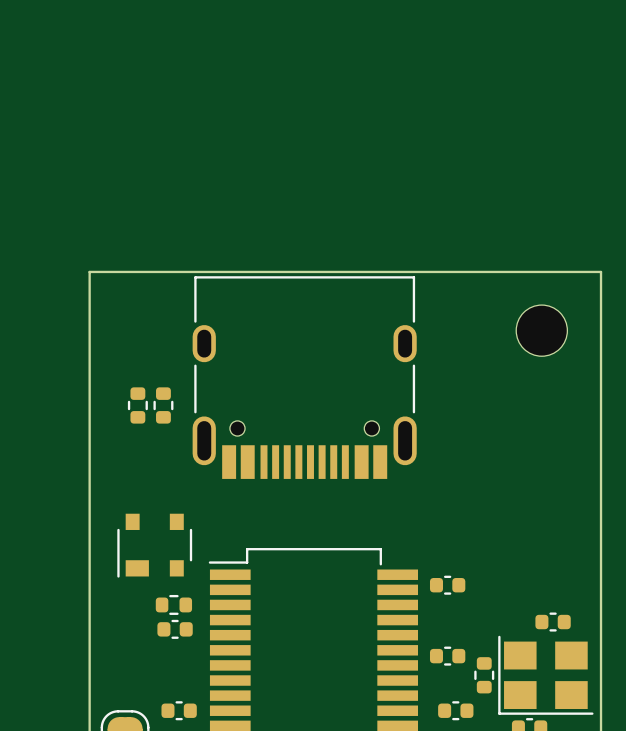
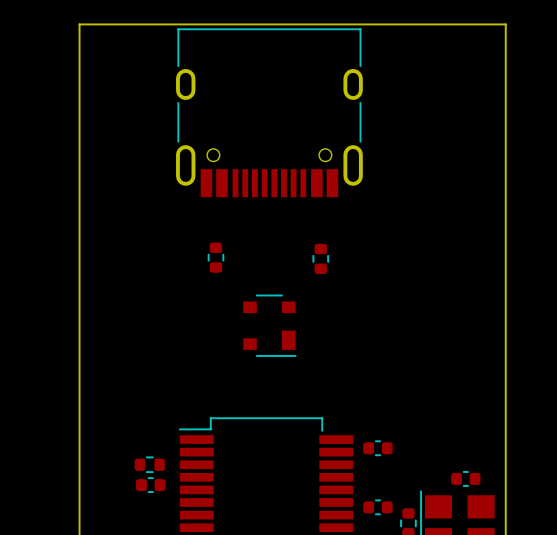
board edge: (89, 271) (601, 271) -> (79, 187) (79, 24) (505, 24) (505, 187)
part: (541, 330) -> none
part: none -> (215, 257)
part: none -> (320, 258)
part position: (304, 377) -> (269, 112)
part: (137, 405) -> none
part: (163, 405) -> none
part rotation: 0° (154, 545) -> 90° counterclockwise (269, 325)
part position: (154, 545) -> (269, 325)

